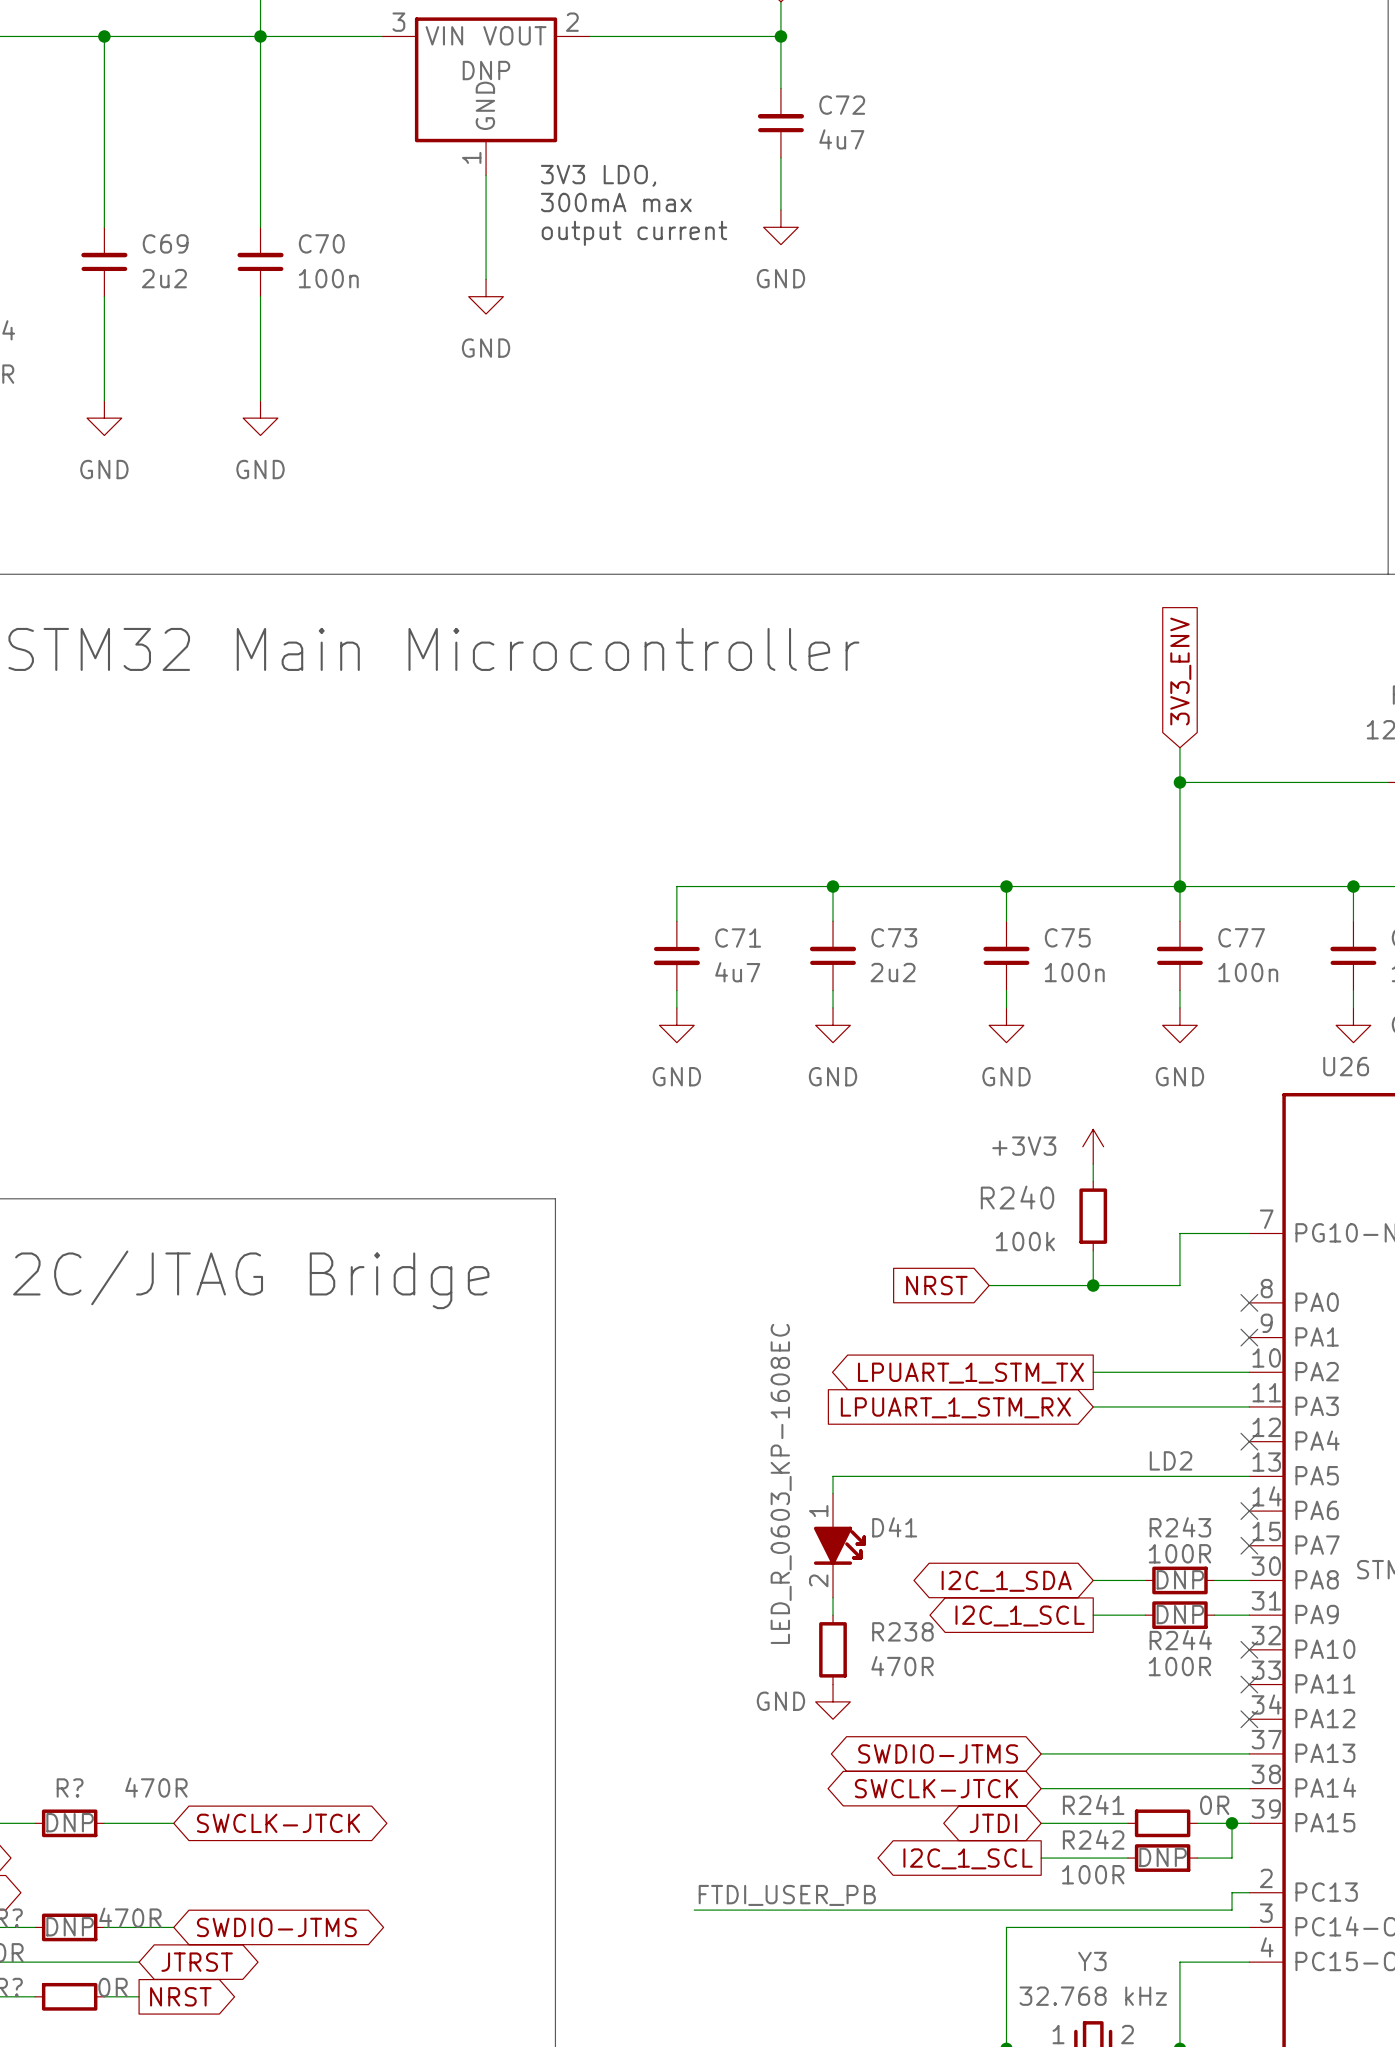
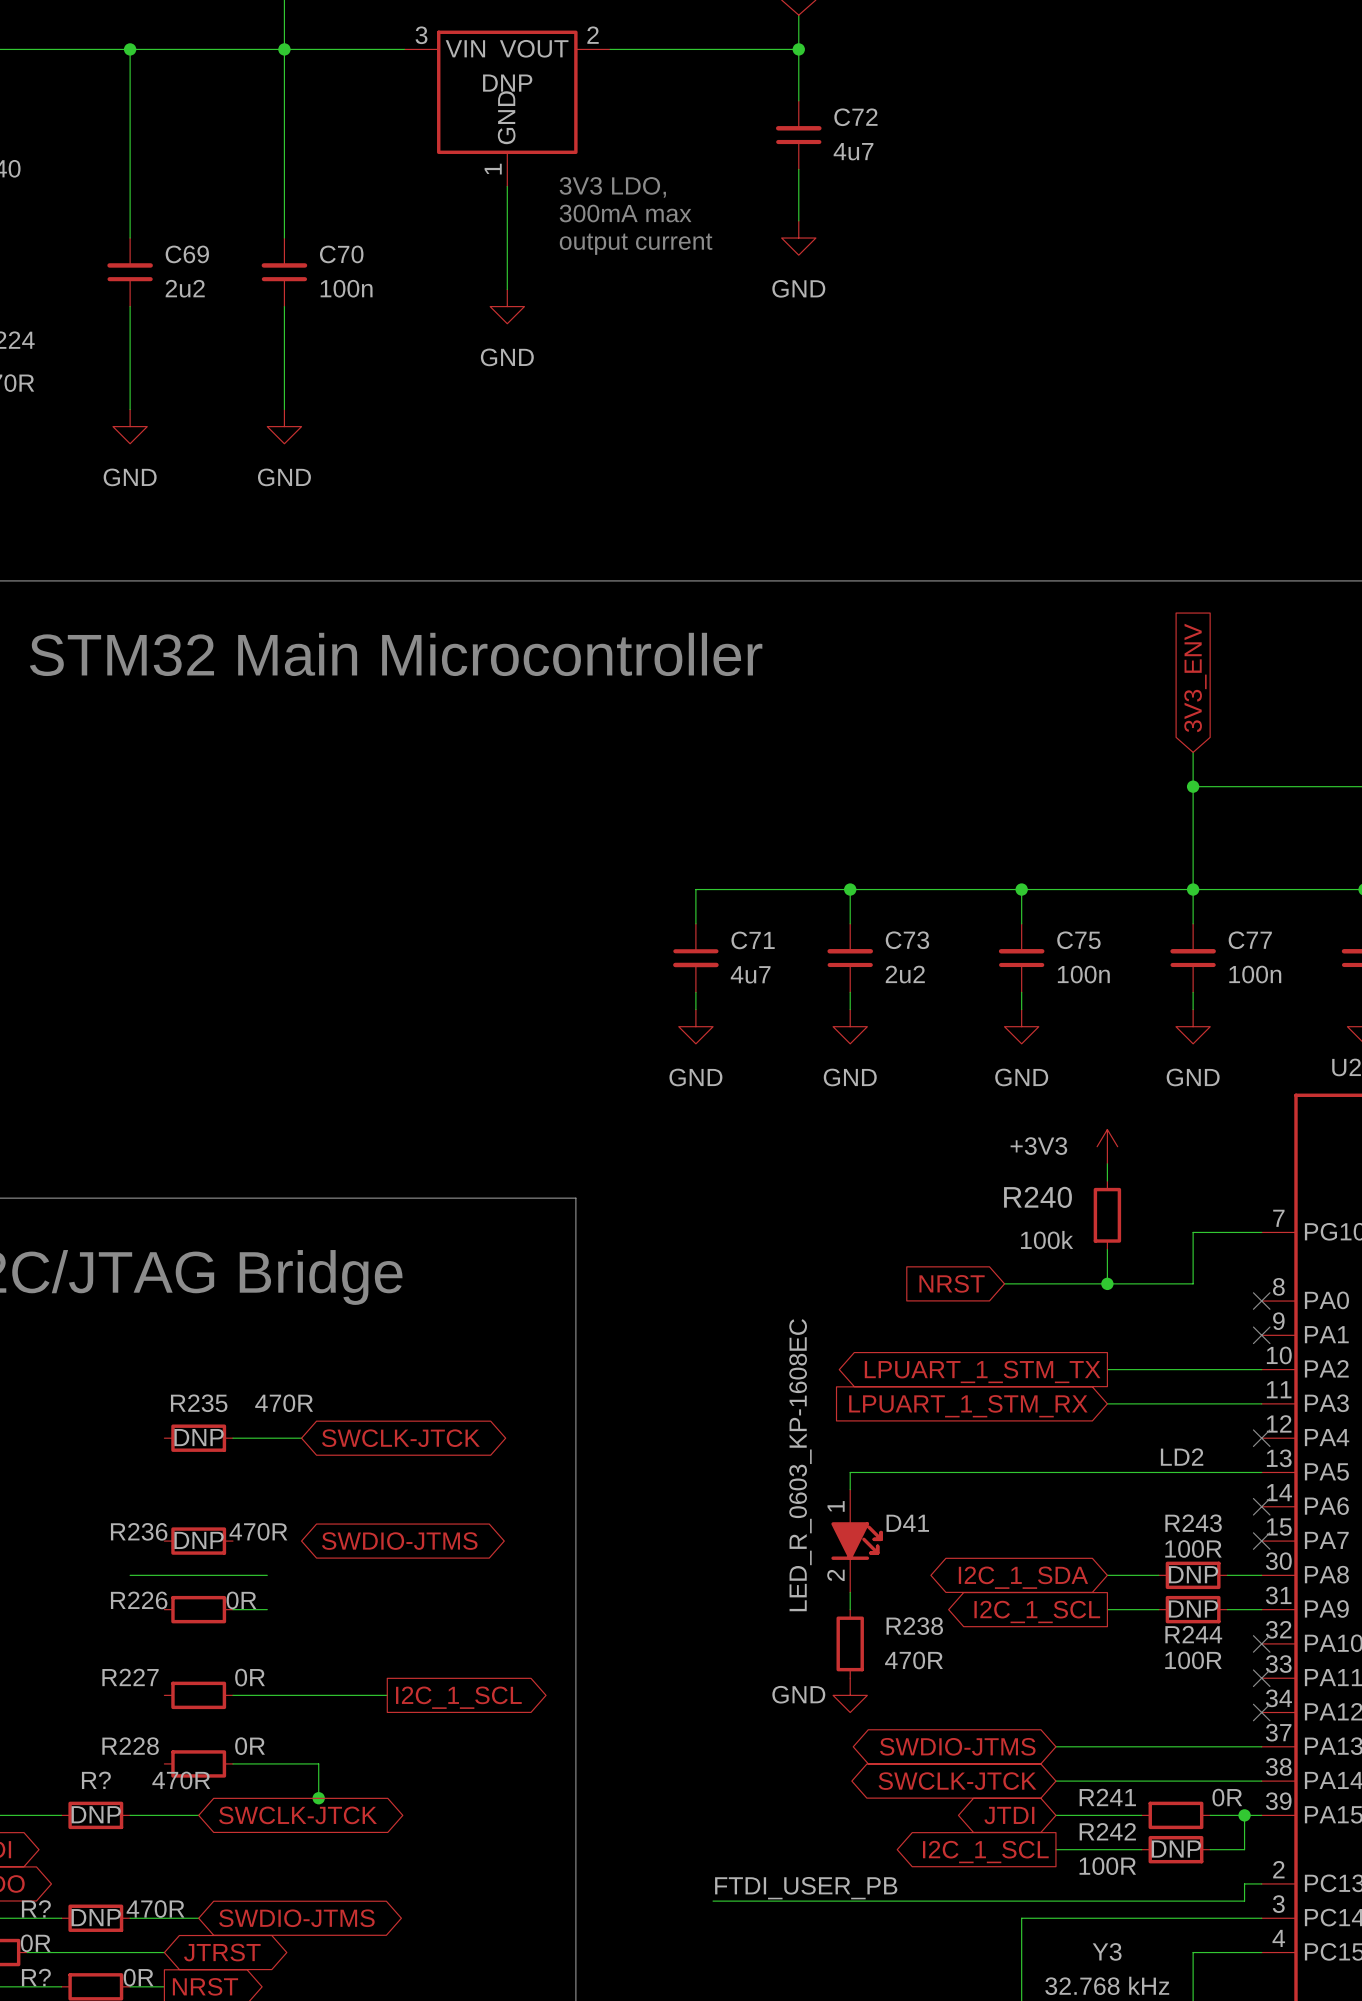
R235: none -> (198, 1438)
wire: none -> (232, 1438) (301, 1438)
global label: none -> SWCLK-JTCK (400, 1438)
R236: none -> (198, 1541)
global label: none -> SWDIO-JTMS (399, 1541)
wire: none -> (130, 1575) (267, 1575)
R226: none -> (198, 1609)
wire: none -> (232, 1609) (267, 1609)
R227: none -> (198, 1695)
wire: none -> (232, 1695) (387, 1695)
global label: none -> I2C_1_SCL (458, 1697)
R228: none -> (198, 1763)
wire: none -> (232, 1763) (318, 1763) (318, 1798)
junction: none -> (318, 1798)

